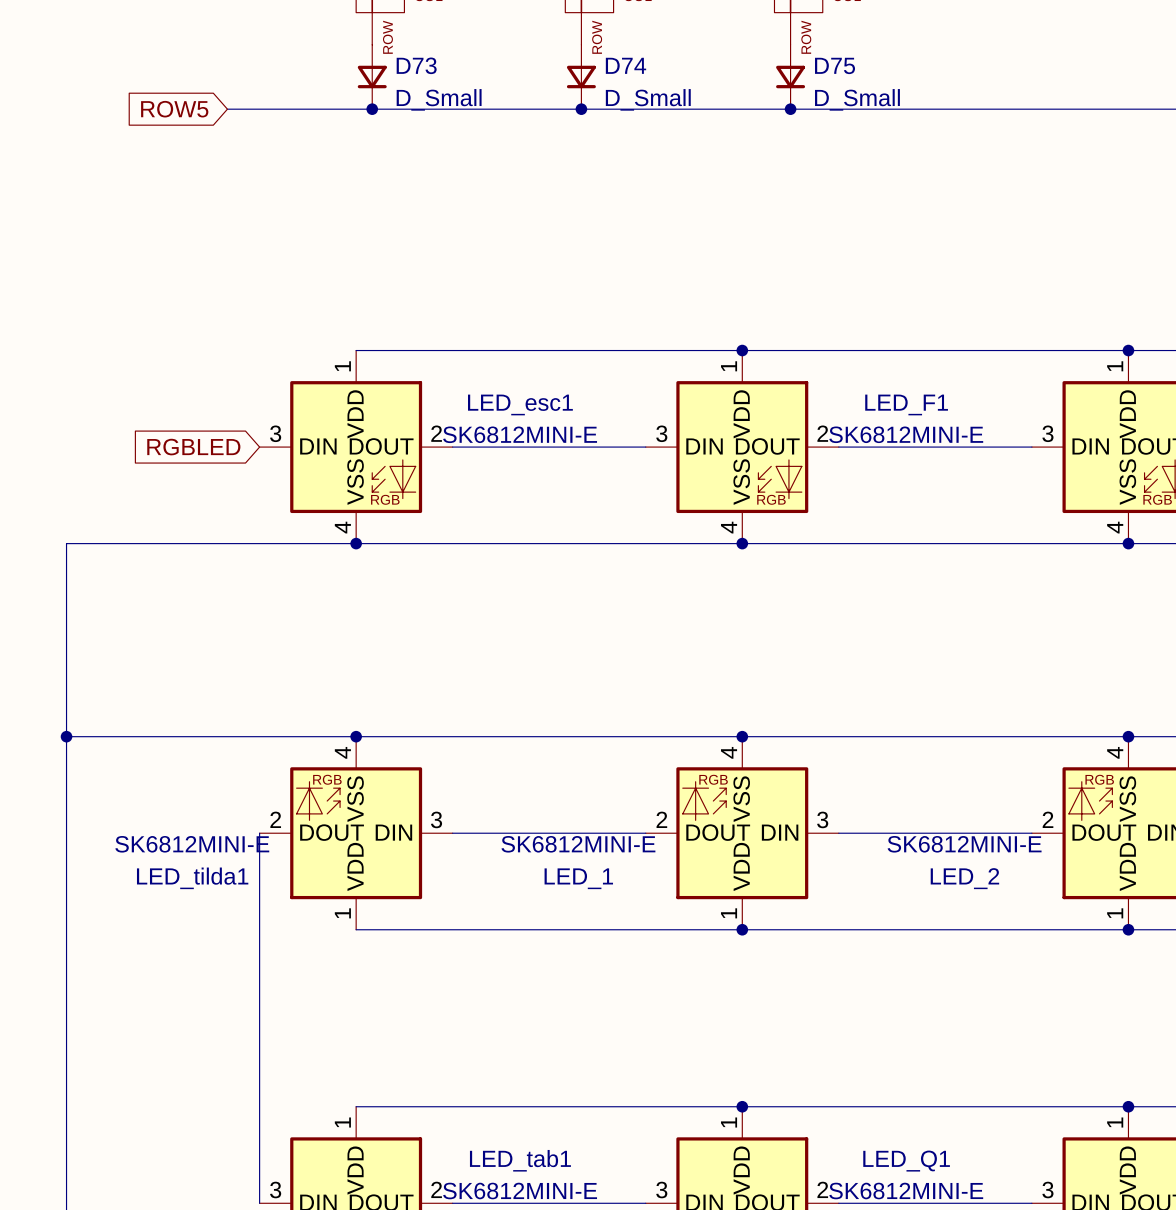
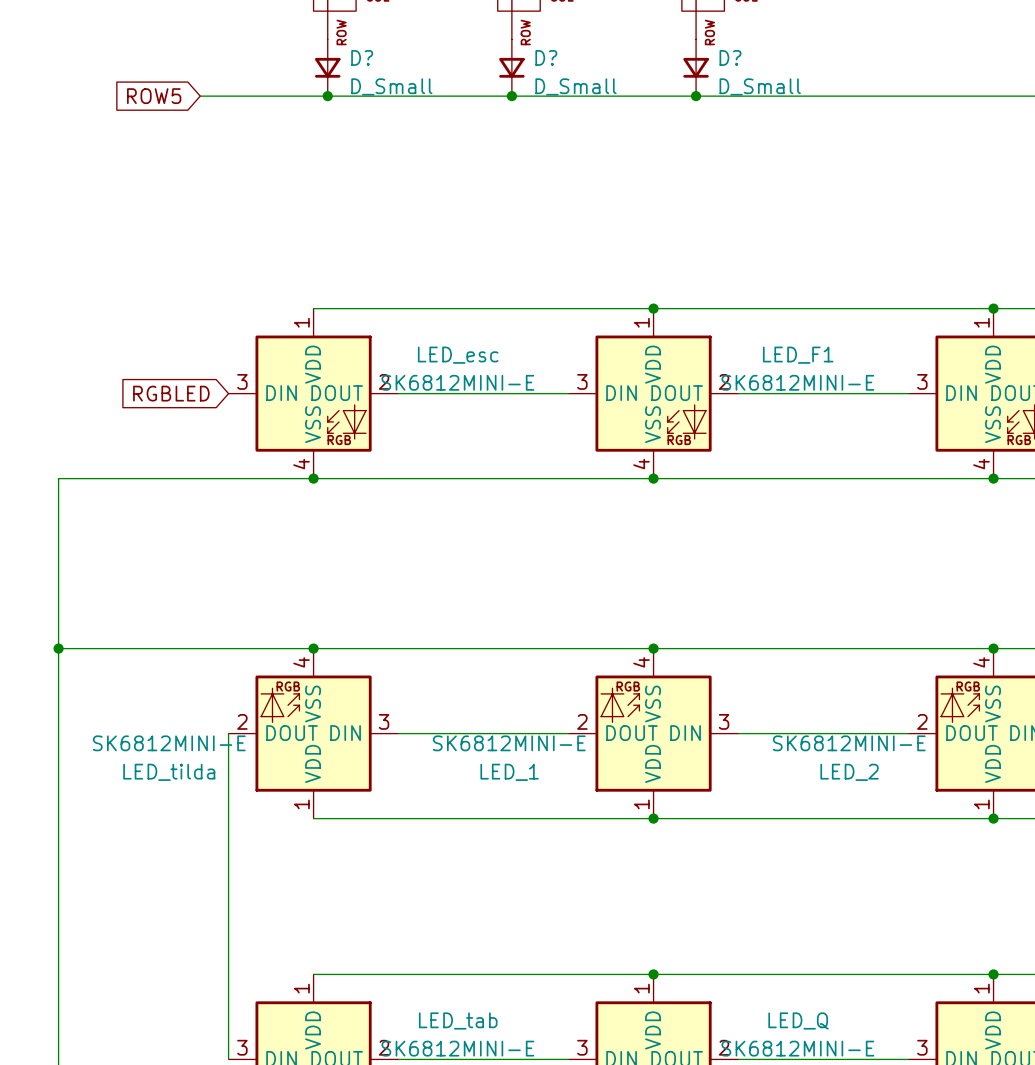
D73 name: D73 (416, 65) -> D? (362, 57)
D74 name: D74 (626, 65) -> D? (546, 57)
D75 name: D75 (835, 65) -> D? (730, 57)
LED_esc1 name: LED_esc1 (520, 404) -> LED_esc (458, 355)
LED_tilda1 name: LED_tilda1 (192, 878) -> LED_tilda (169, 772)
LED_tab1 name: LED_tab1 (520, 1160) -> LED_tab (458, 1020)
LED_Q1 name: LED_Q1 (906, 1161) -> LED_Q (798, 1020)

